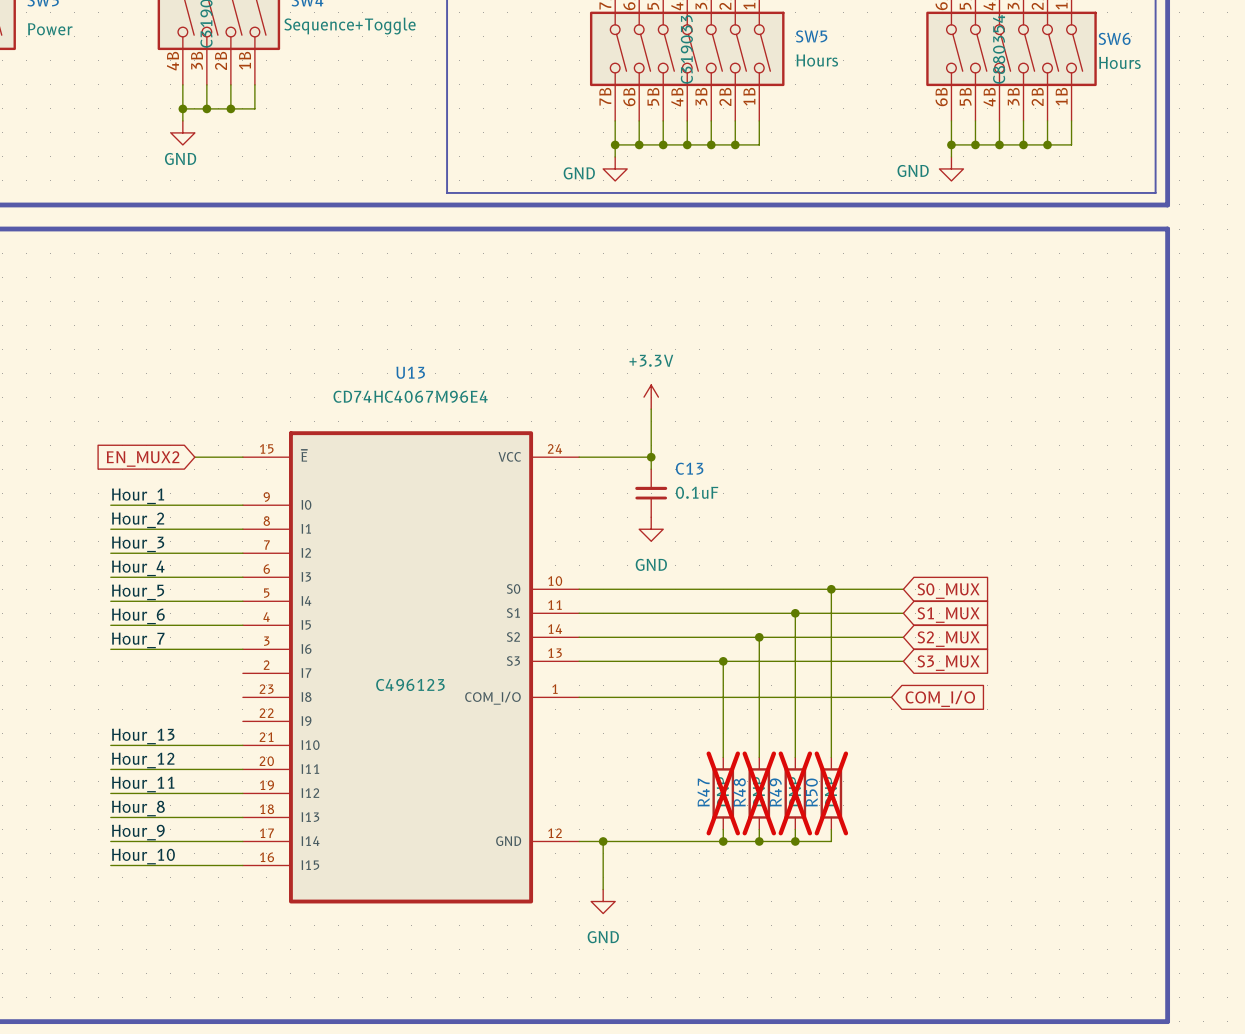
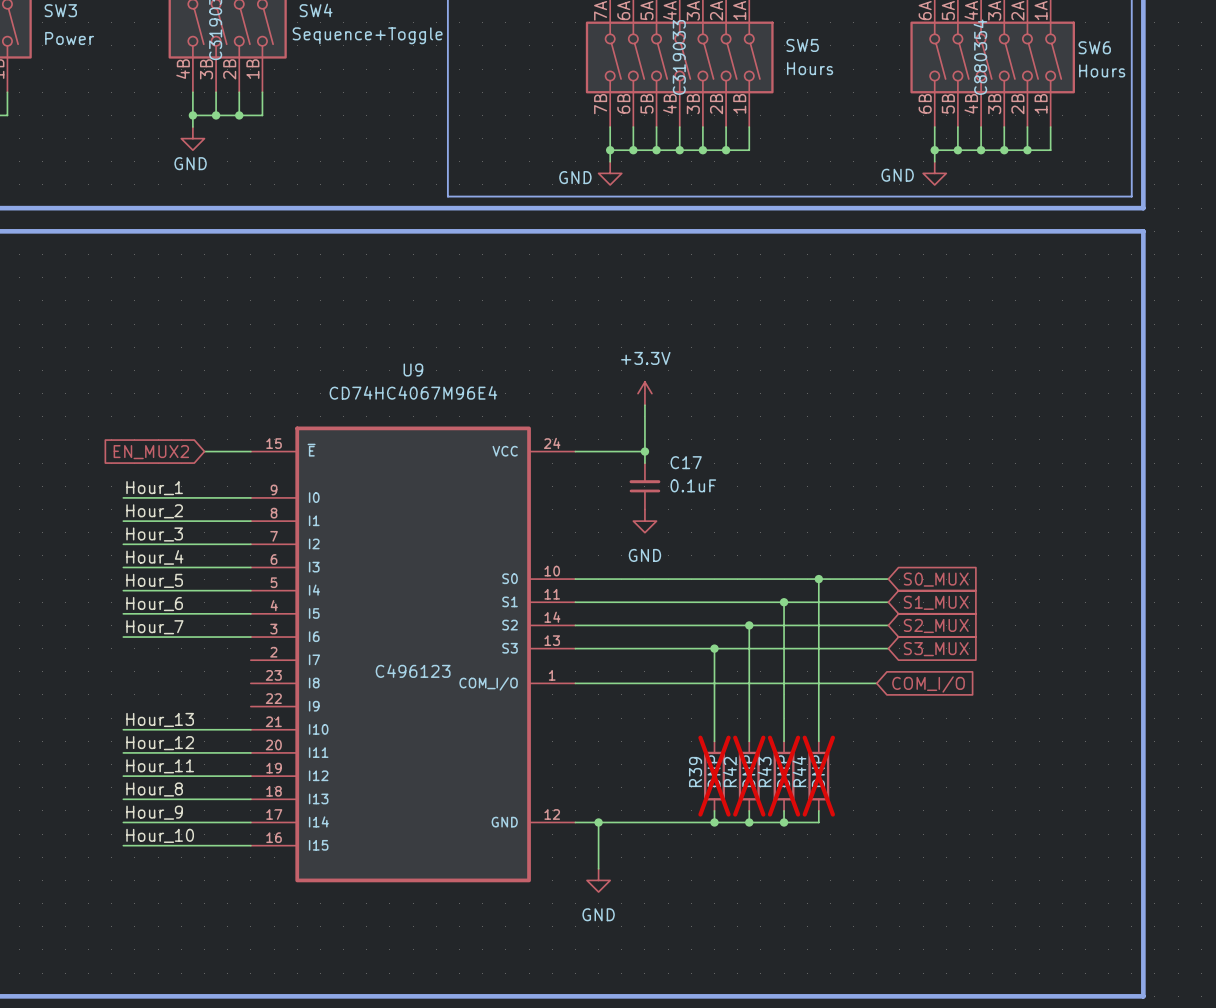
U13 name: U13 (410, 372) -> U9 (413, 370)
C13 name: C13 (689, 468) -> C17 (686, 462)
R47 name: R47 (703, 792) -> R39 (695, 772)
R48 name: R48 (739, 792) -> R42 (730, 772)
R49 name: R49 (775, 792) -> R43 (764, 772)
R50 name: R50 (811, 792) -> R44 (799, 771)

